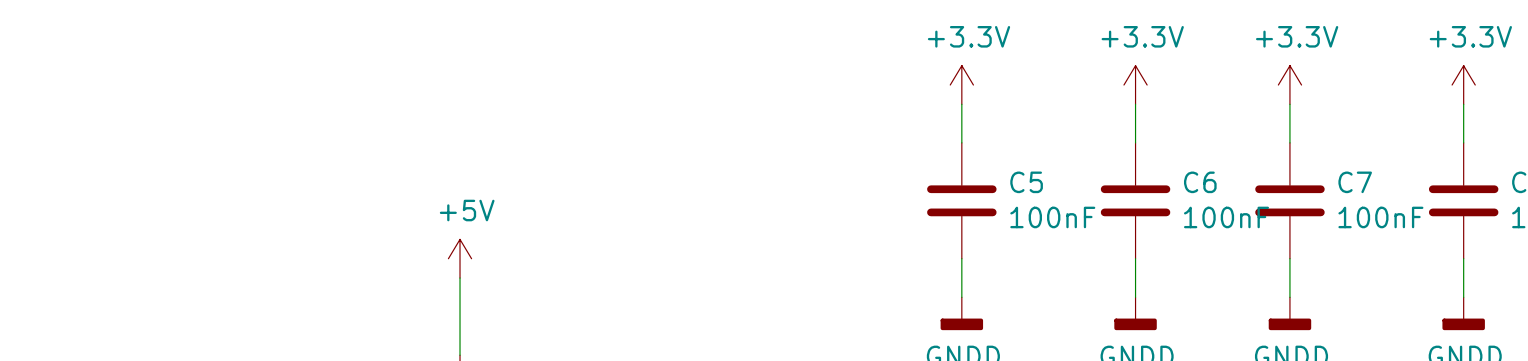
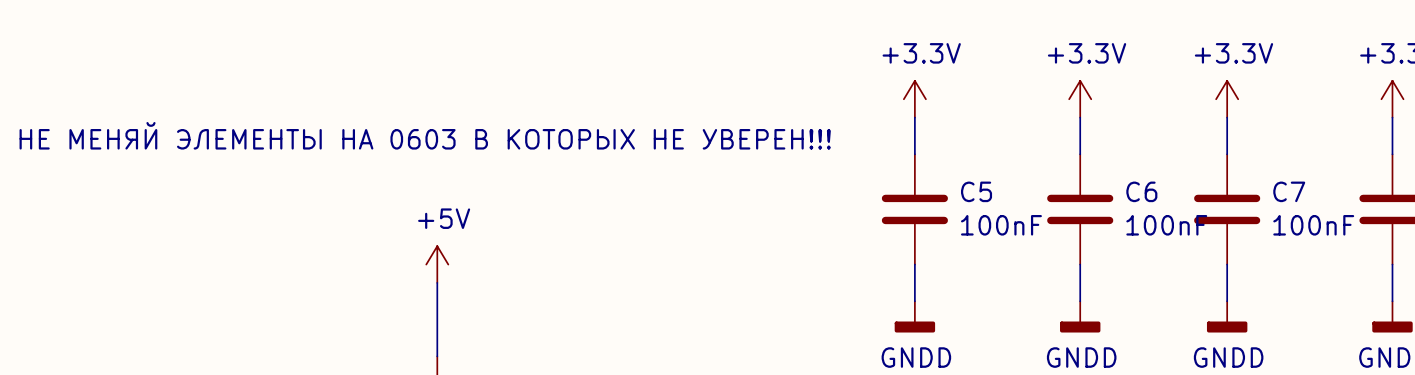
text: none -> НЕ МЕНЯЙ ЭЛЕМЕНТЫ НА 0603 В КОТОРЫХ НЕ УВЕРЕН!!! (425, 135)

